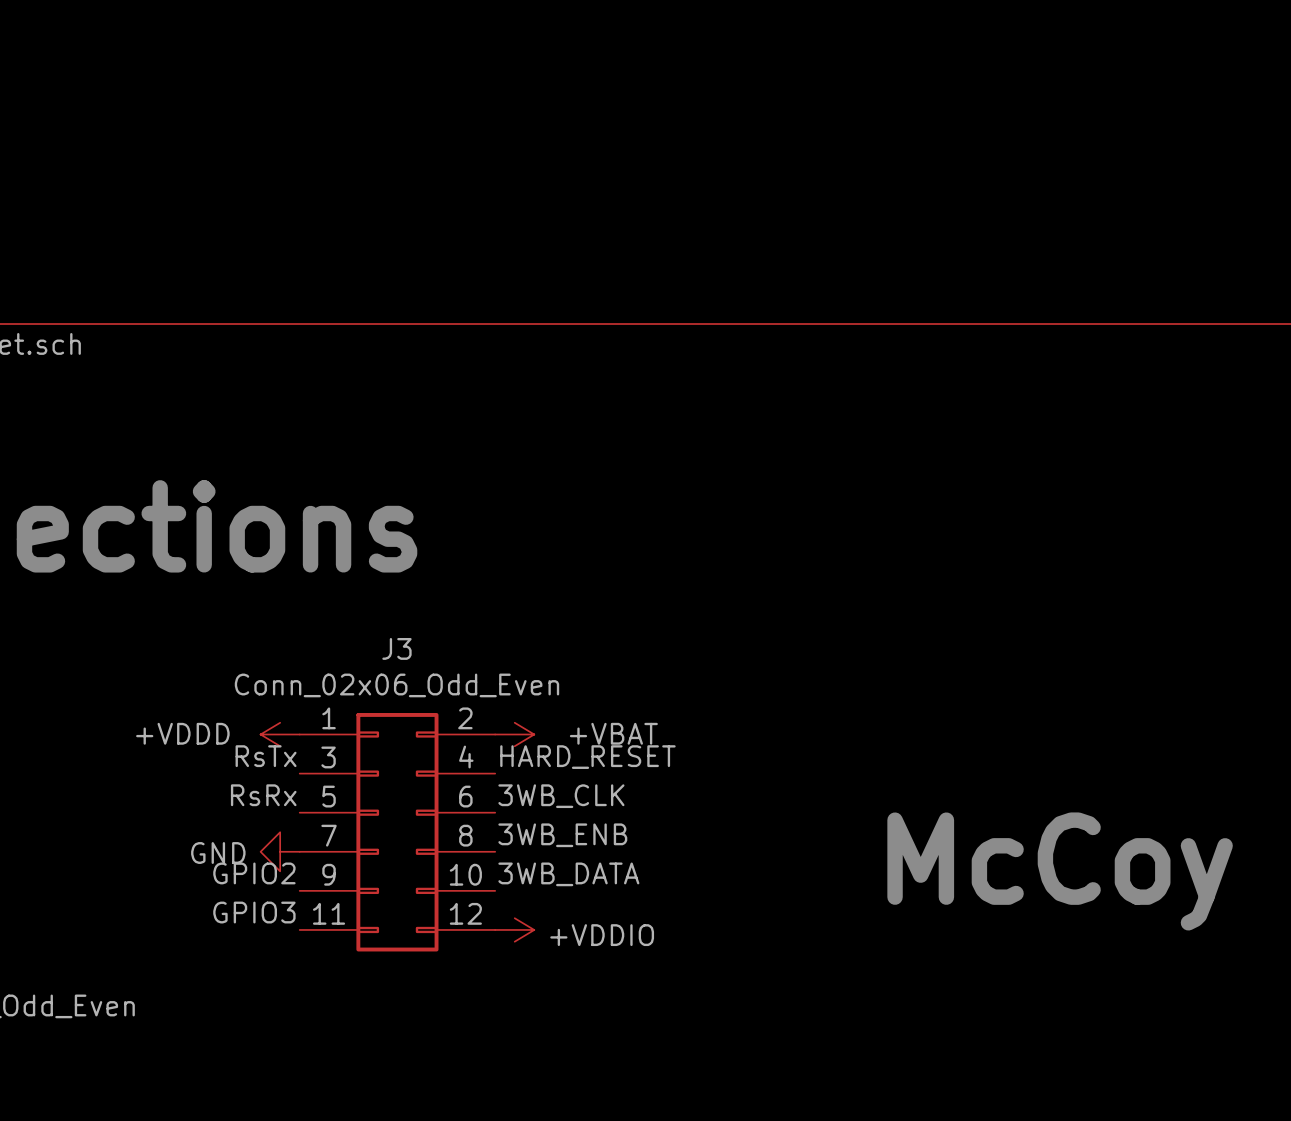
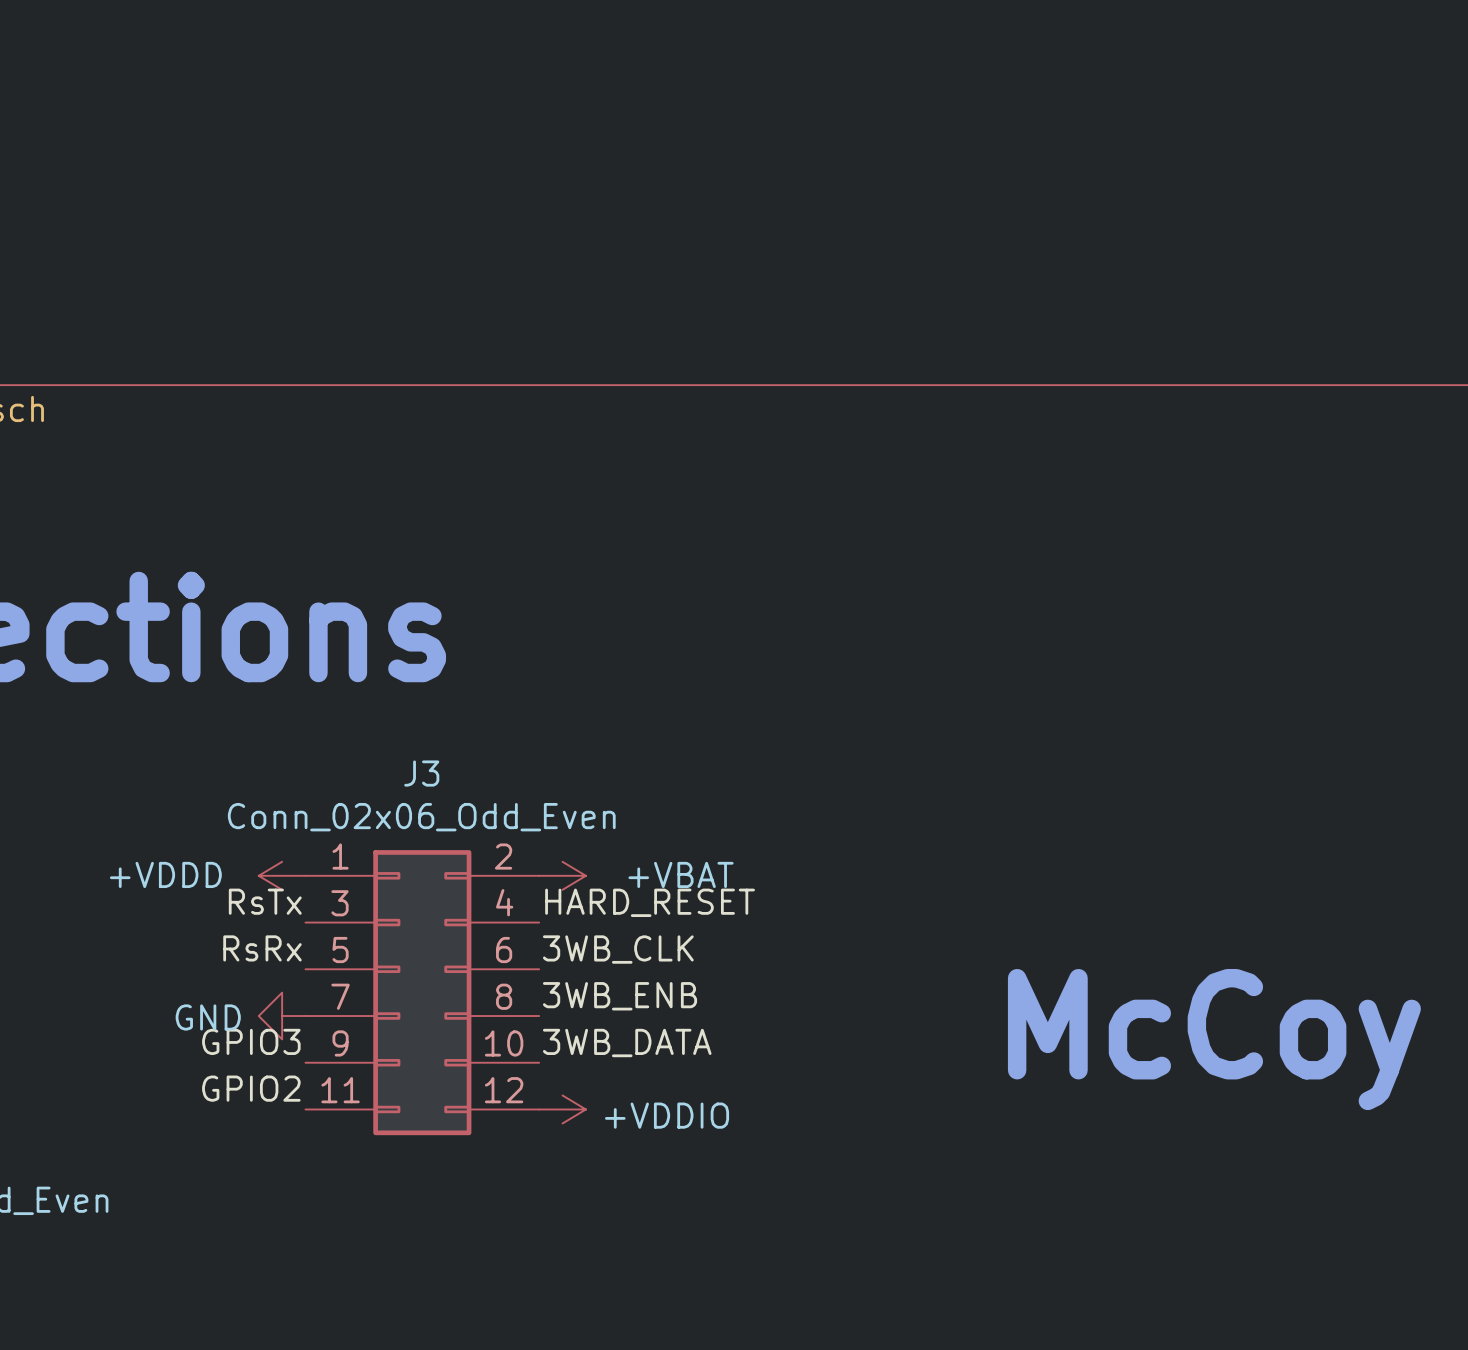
label: GPIO2 (254, 873) -> GPIO3 (251, 1041)
label: GPIO3 (254, 912) -> GPIO2 (251, 1088)

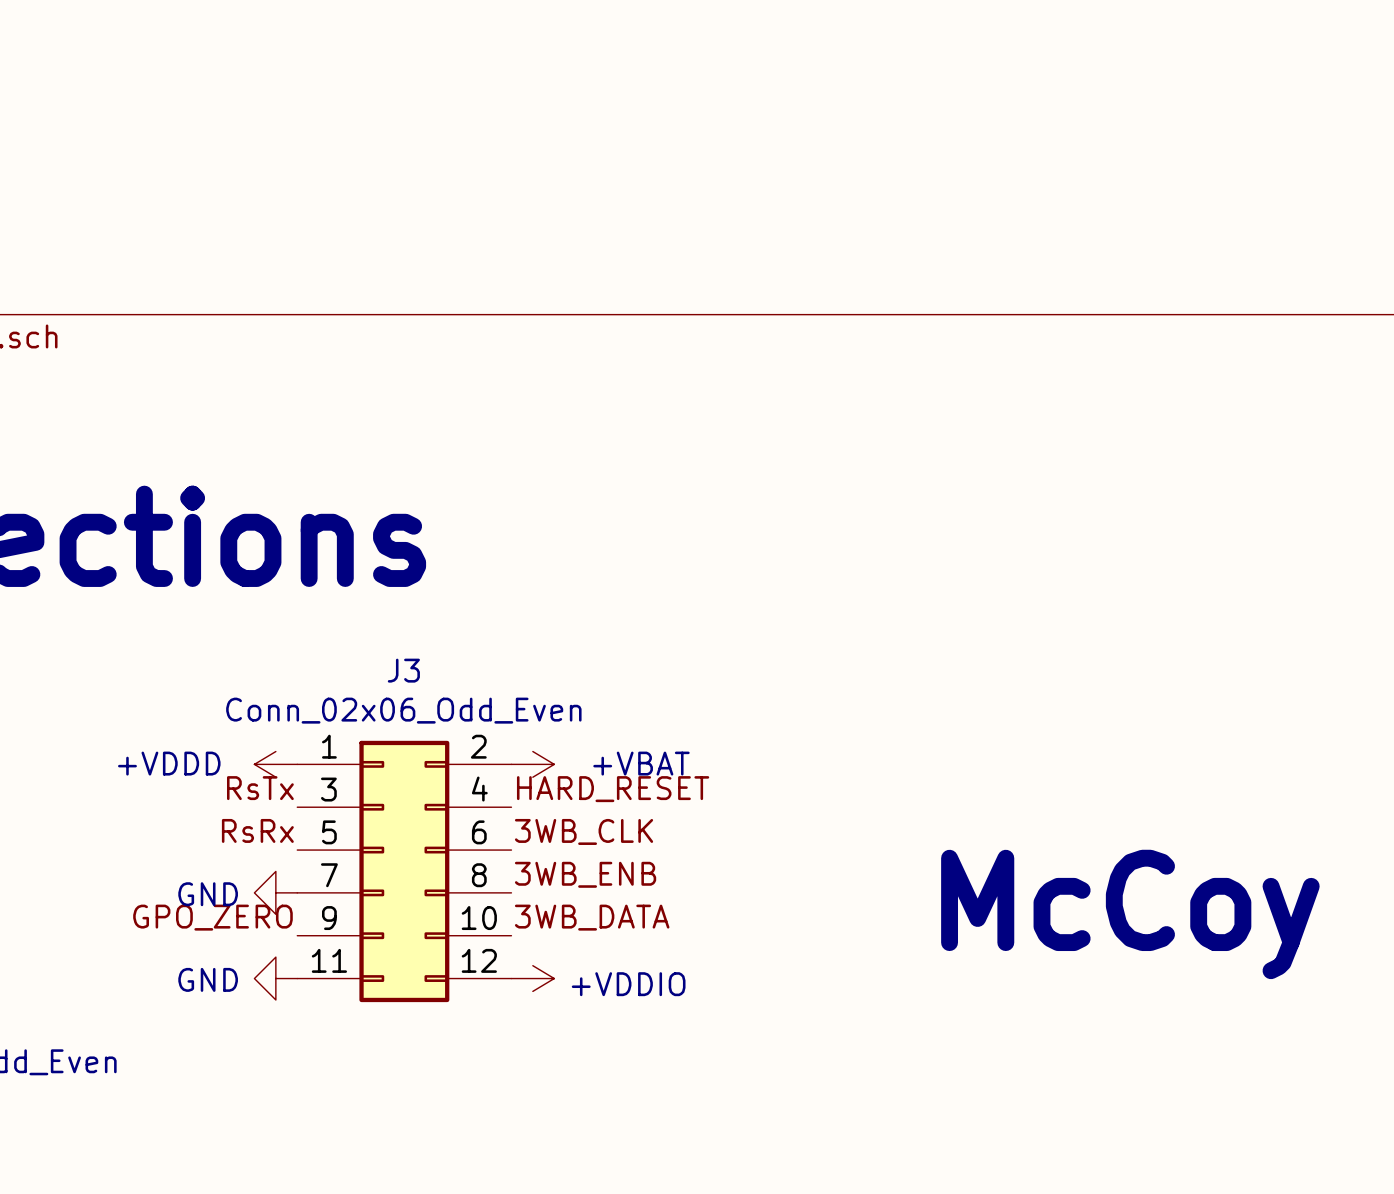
label: GPIO3 (251, 1041) -> GPO_ZERO (212, 917)
label: GPIO2 (251, 1088) -> none
power symbol: none -> GND (275, 978)

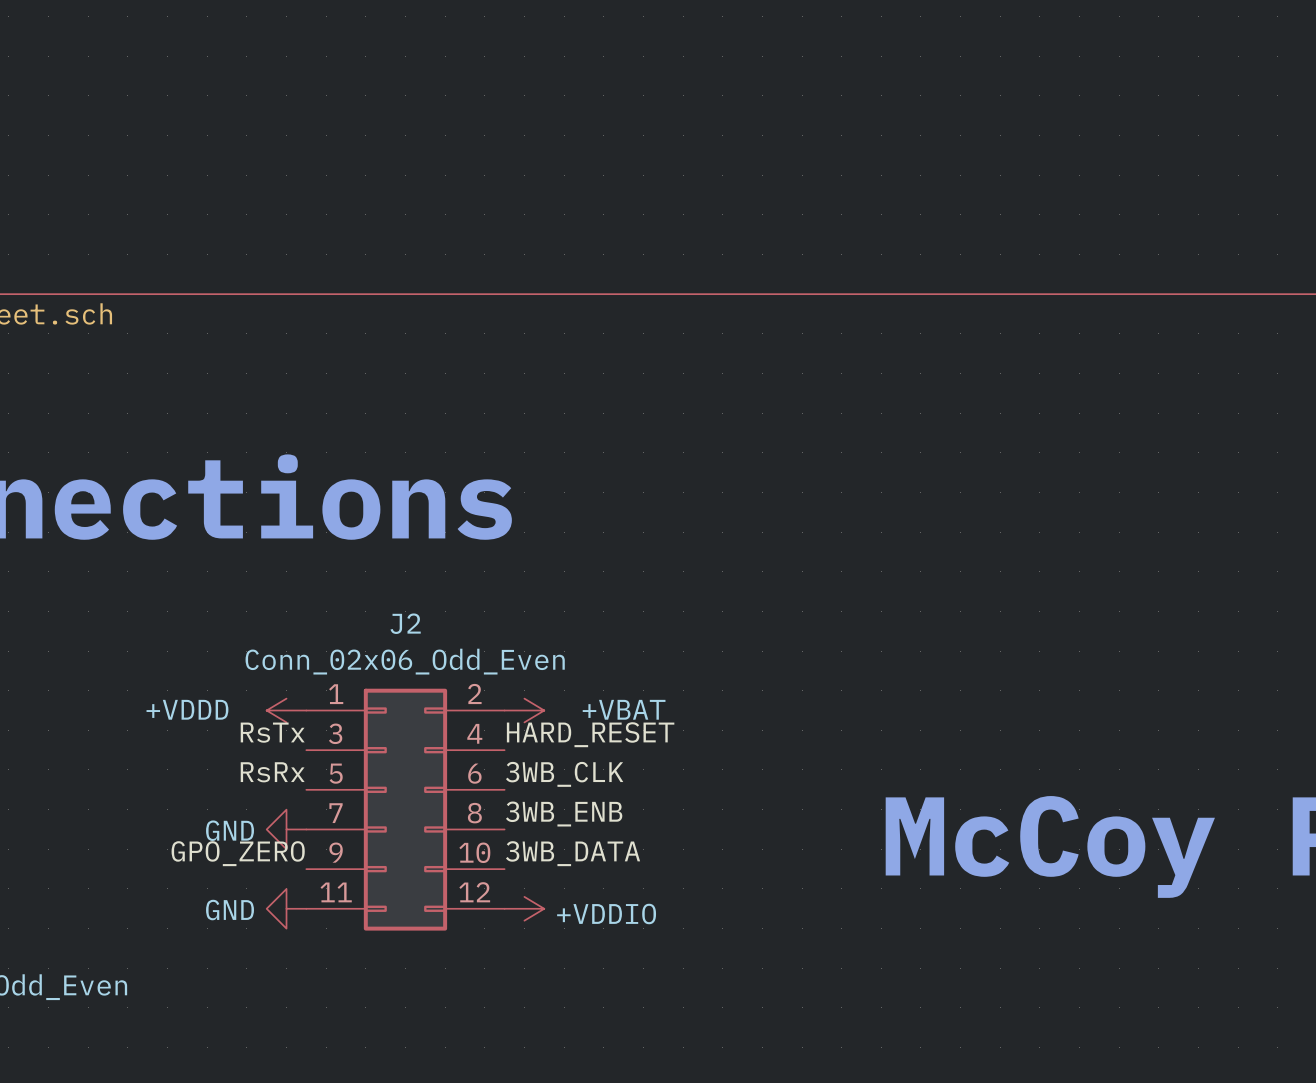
J3 name: J3 (403, 670) -> J2 (405, 623)

